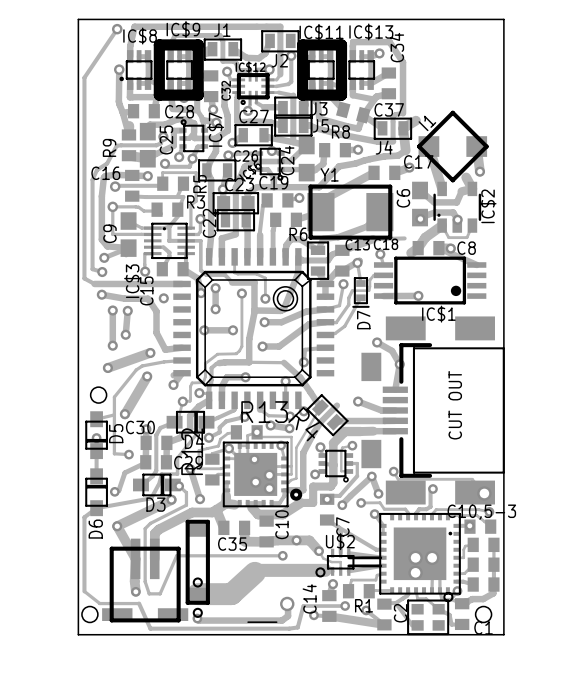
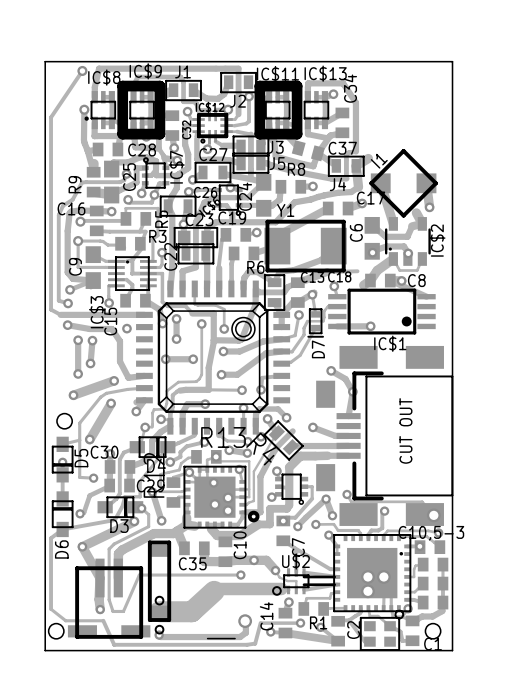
track: (284, 362) (300, 377) (310, 392) -> none
via: none -> (242, 390)
track: none -> (286, 417) (278, 409) (259, 409) (255, 414) (255, 426)
via: none -> (286, 417)
via: none -> (267, 418)
track: (352, 445) (342, 447) (341, 450) (341, 471) (349, 471) -> none
via: (352, 445) -> none

